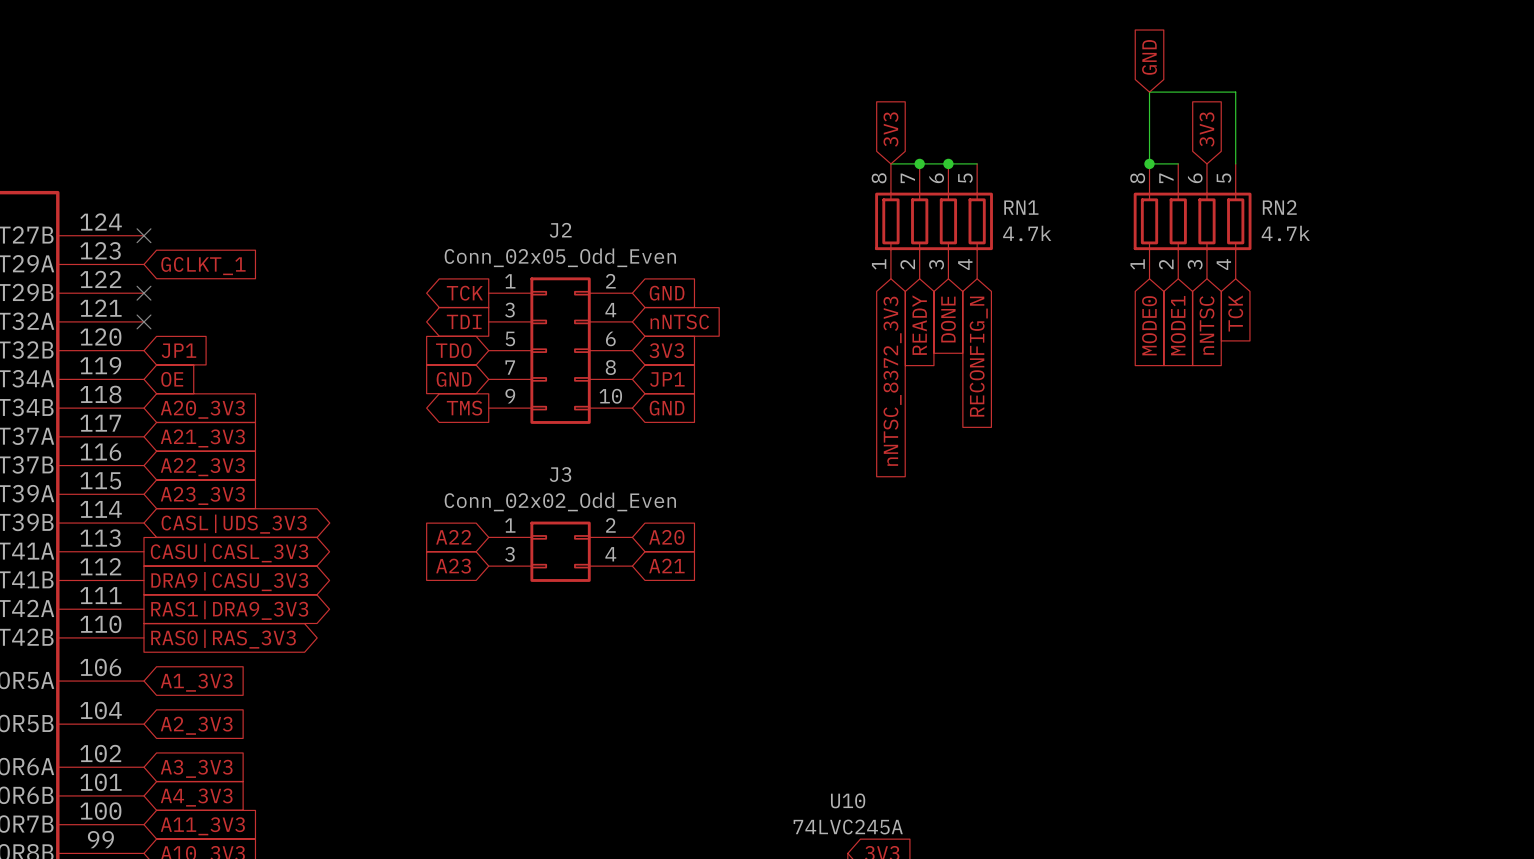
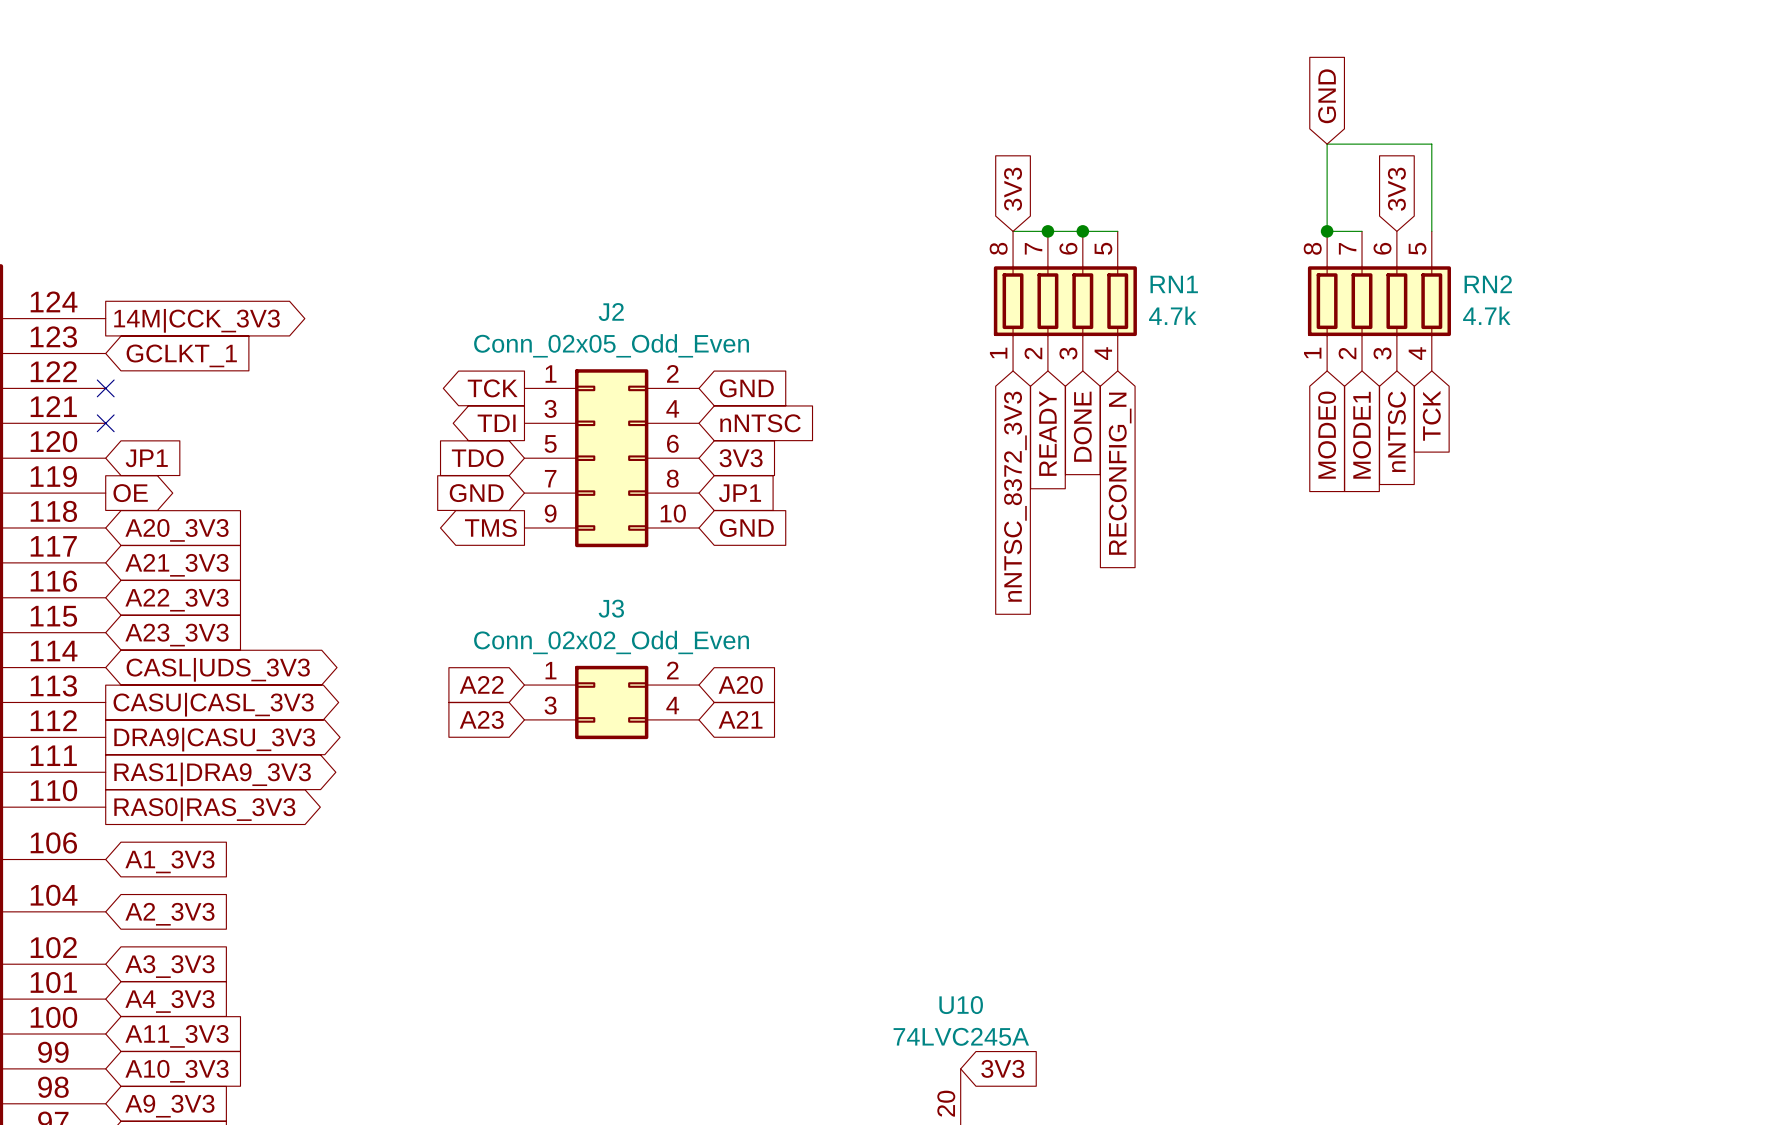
no-connect mark: (143, 235) -> none
global label: none -> 14M|CCK_3V3 (197, 320)
global label shape: input (172, 379) -> output (130, 493)

